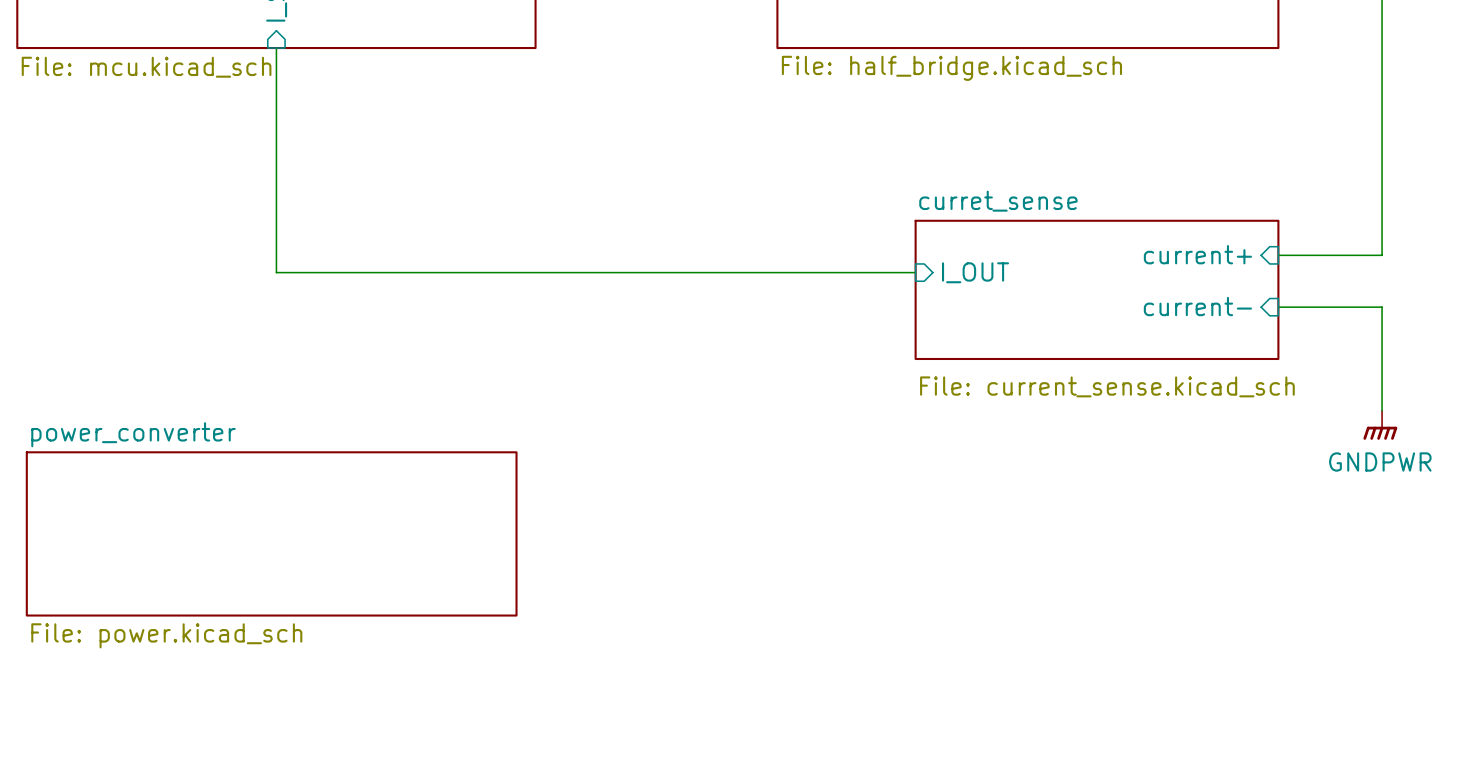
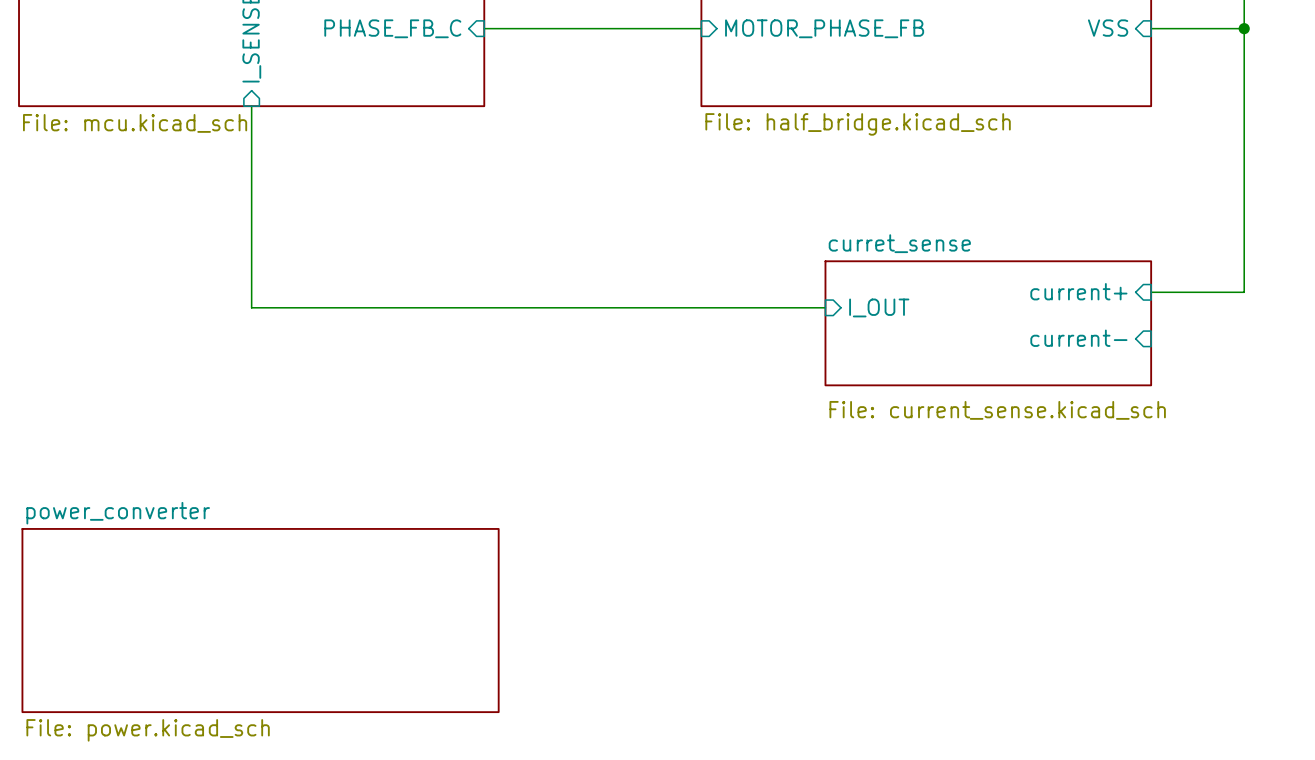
wire: (1278, 307) (1382, 307) (1382, 410) -> none
power symbol: GNDPWR (1380, 425) -> none
sheet power_converter: File: power.kicad_sch (271, 533) -> none
sheet power_converter: none -> File: power.kicad_sch (260, 620)

